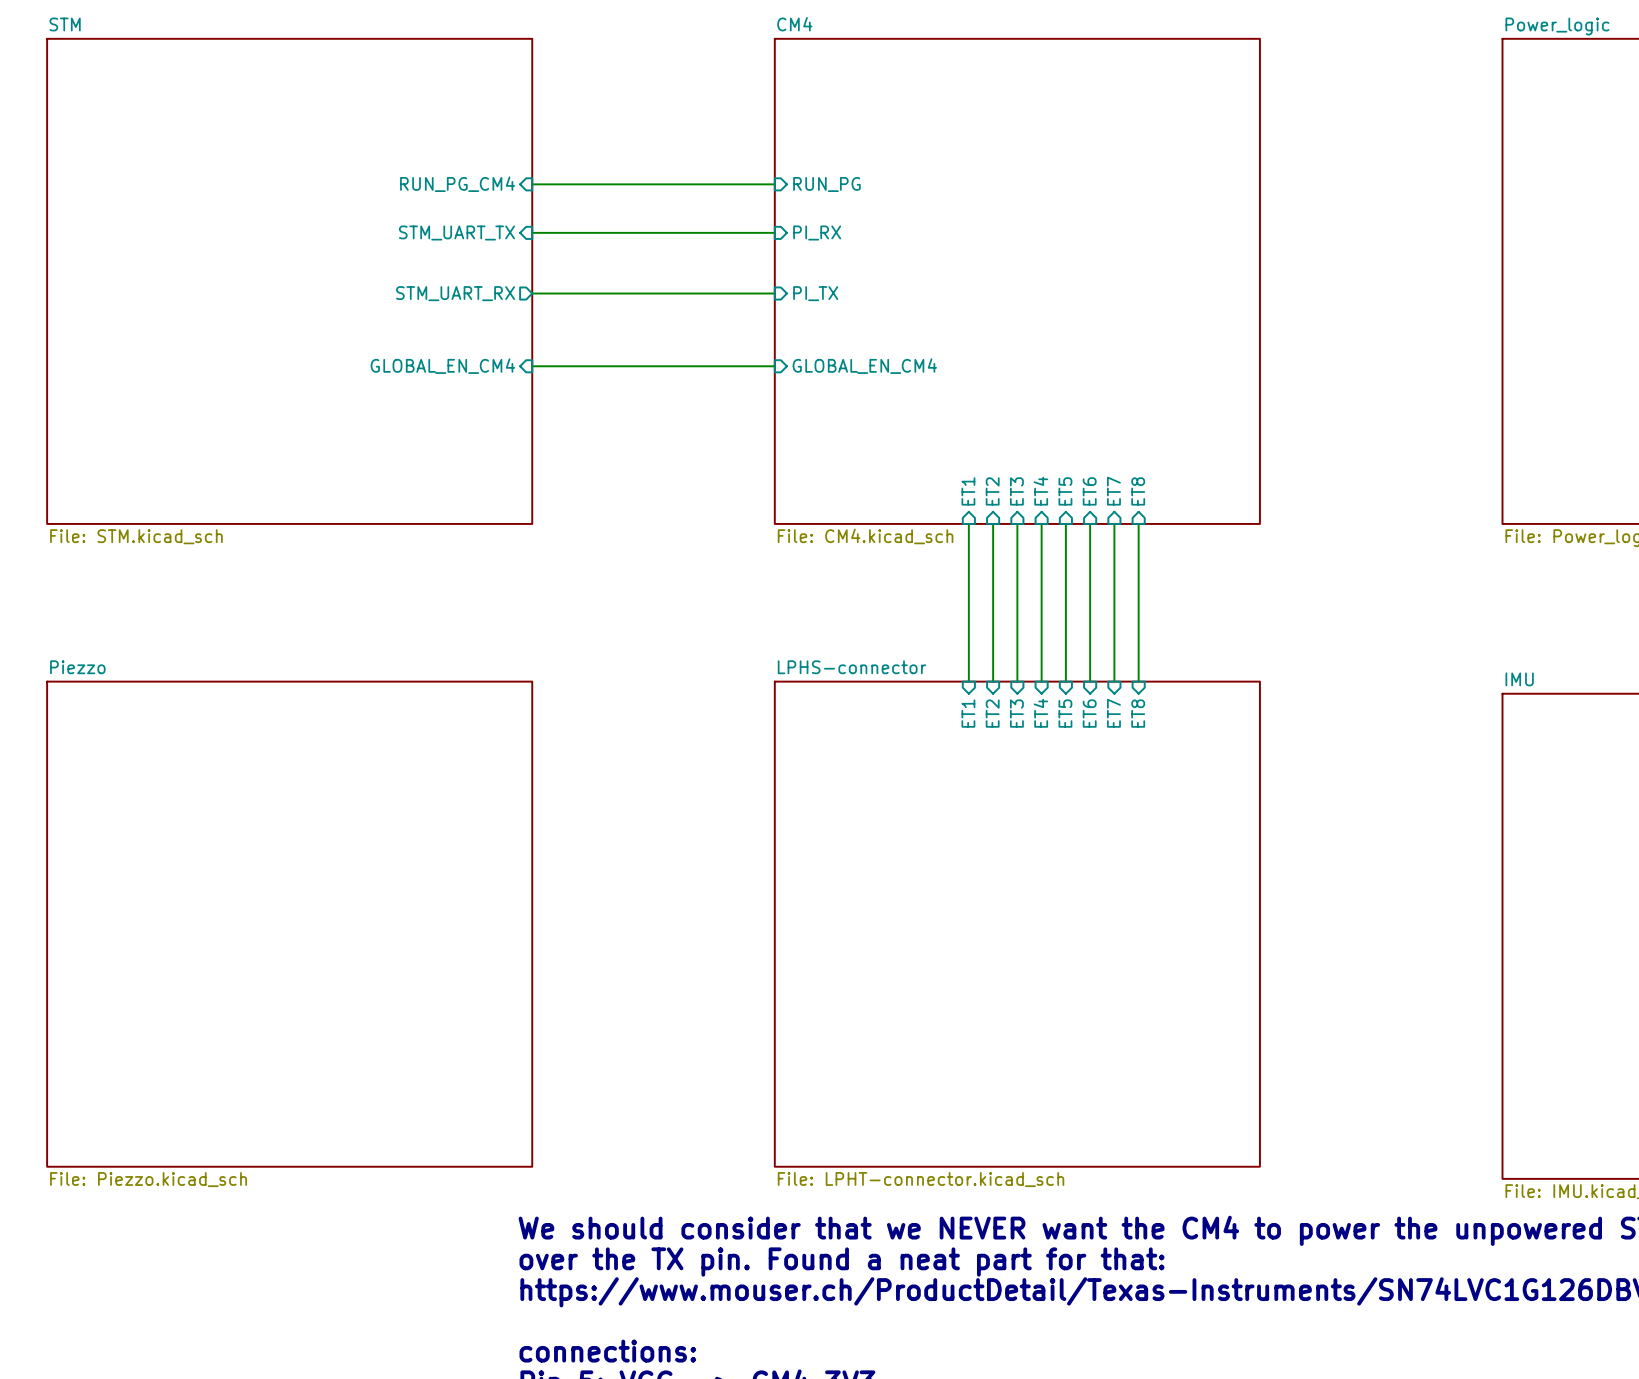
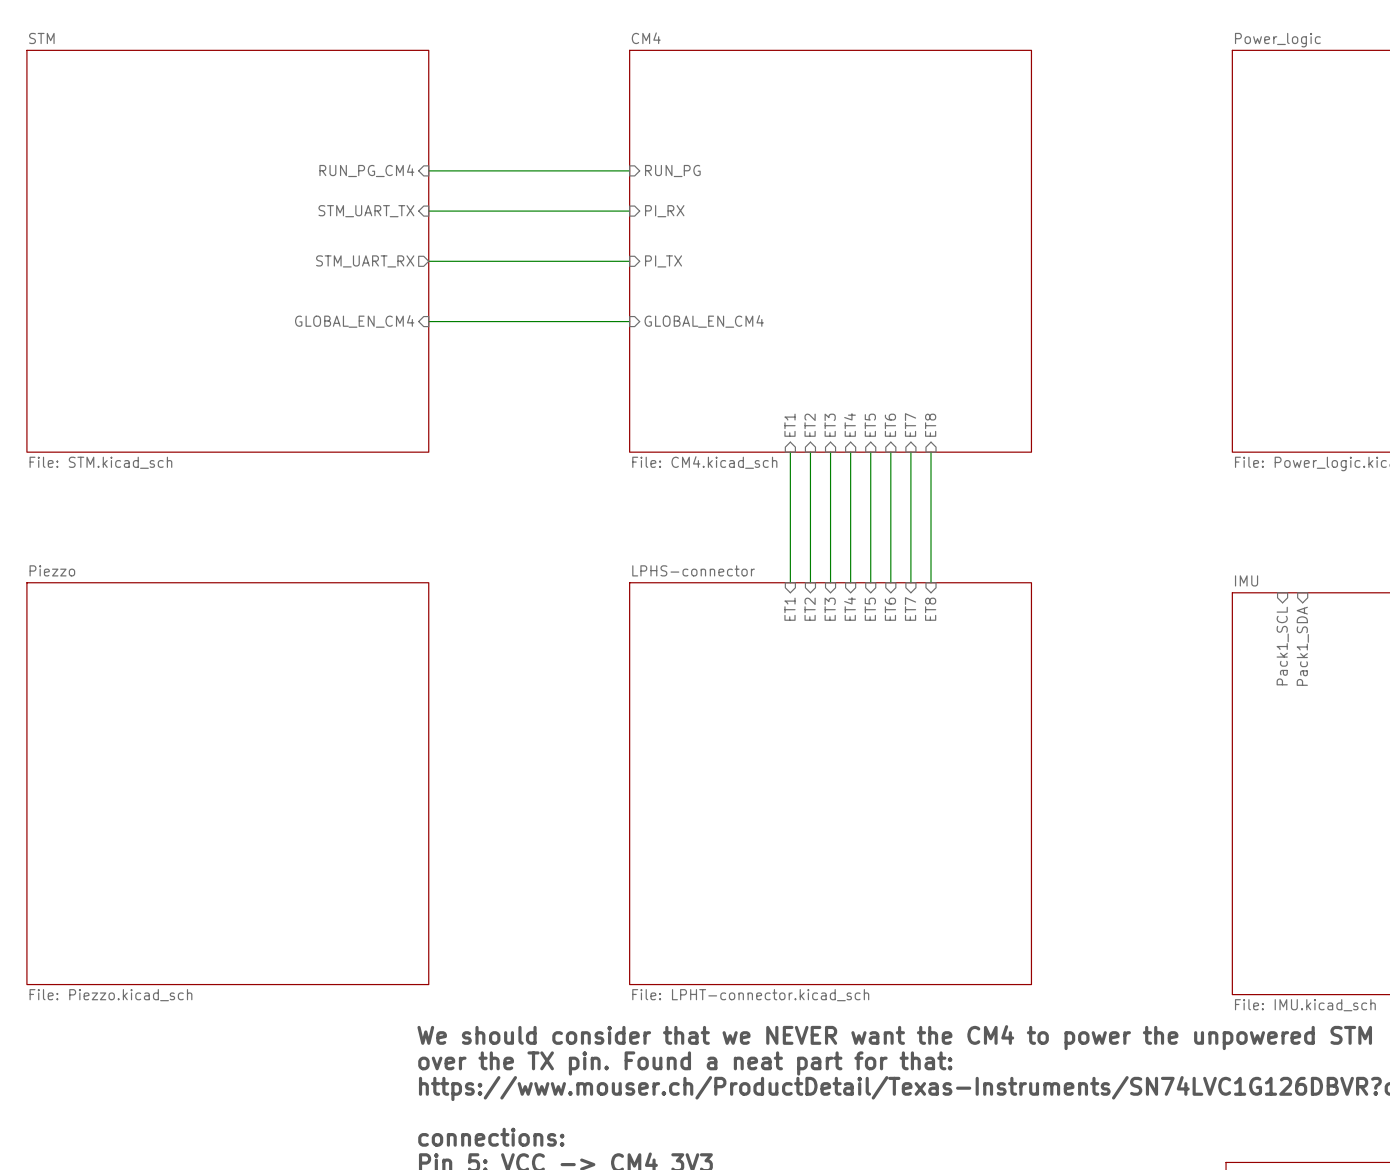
sheet pin: none -> Pack1_SCL (1282, 646)
sheet pin: none -> Pack1_SDA (1302, 646)

